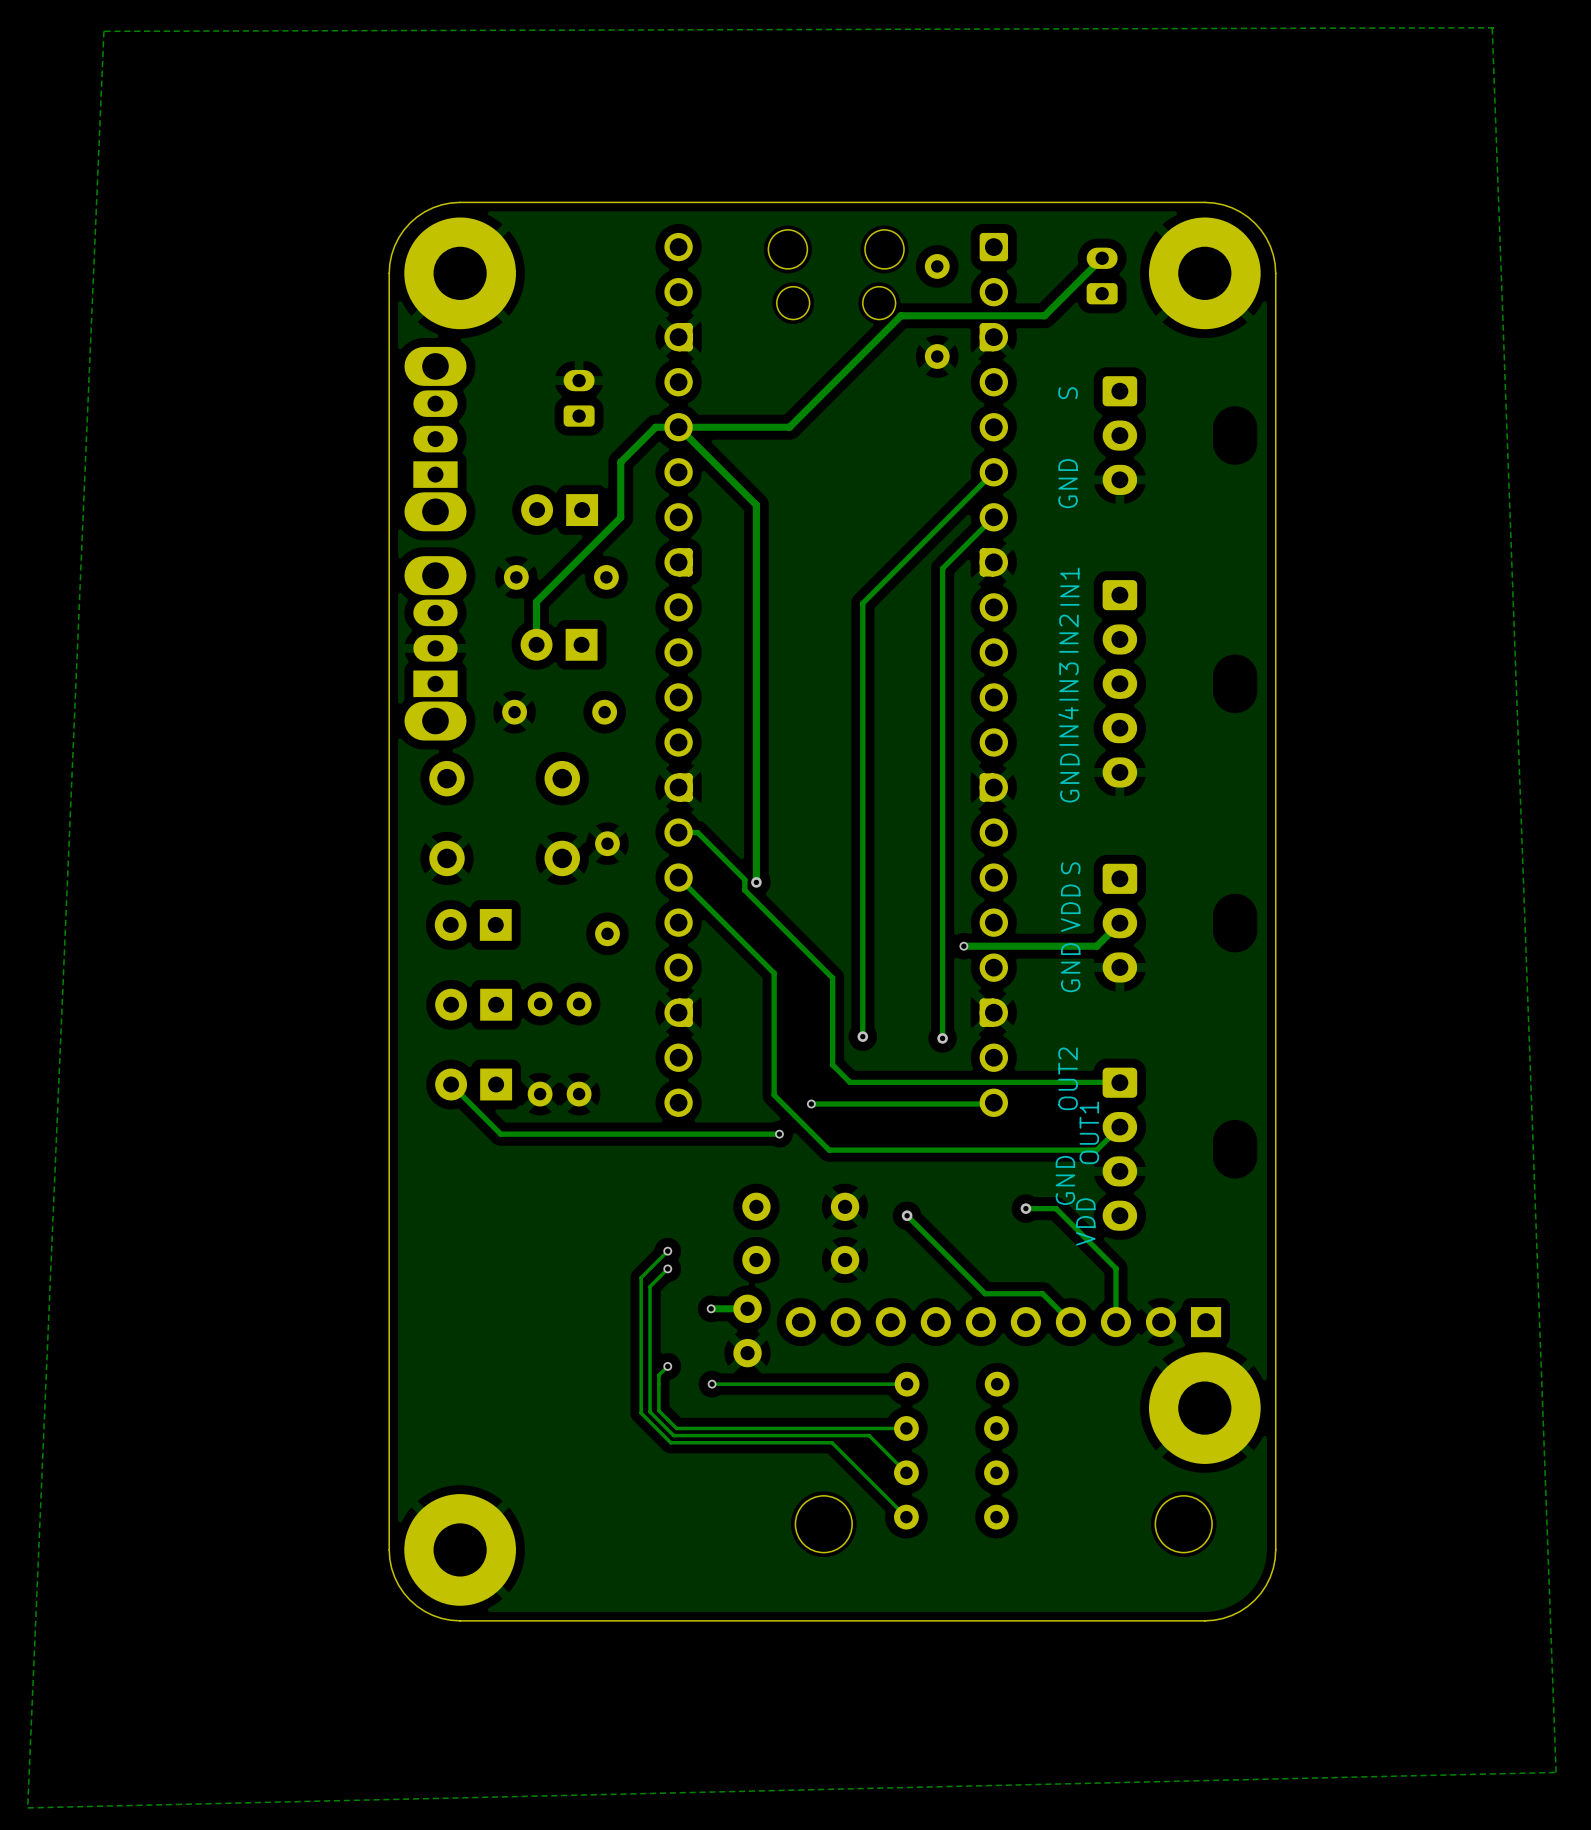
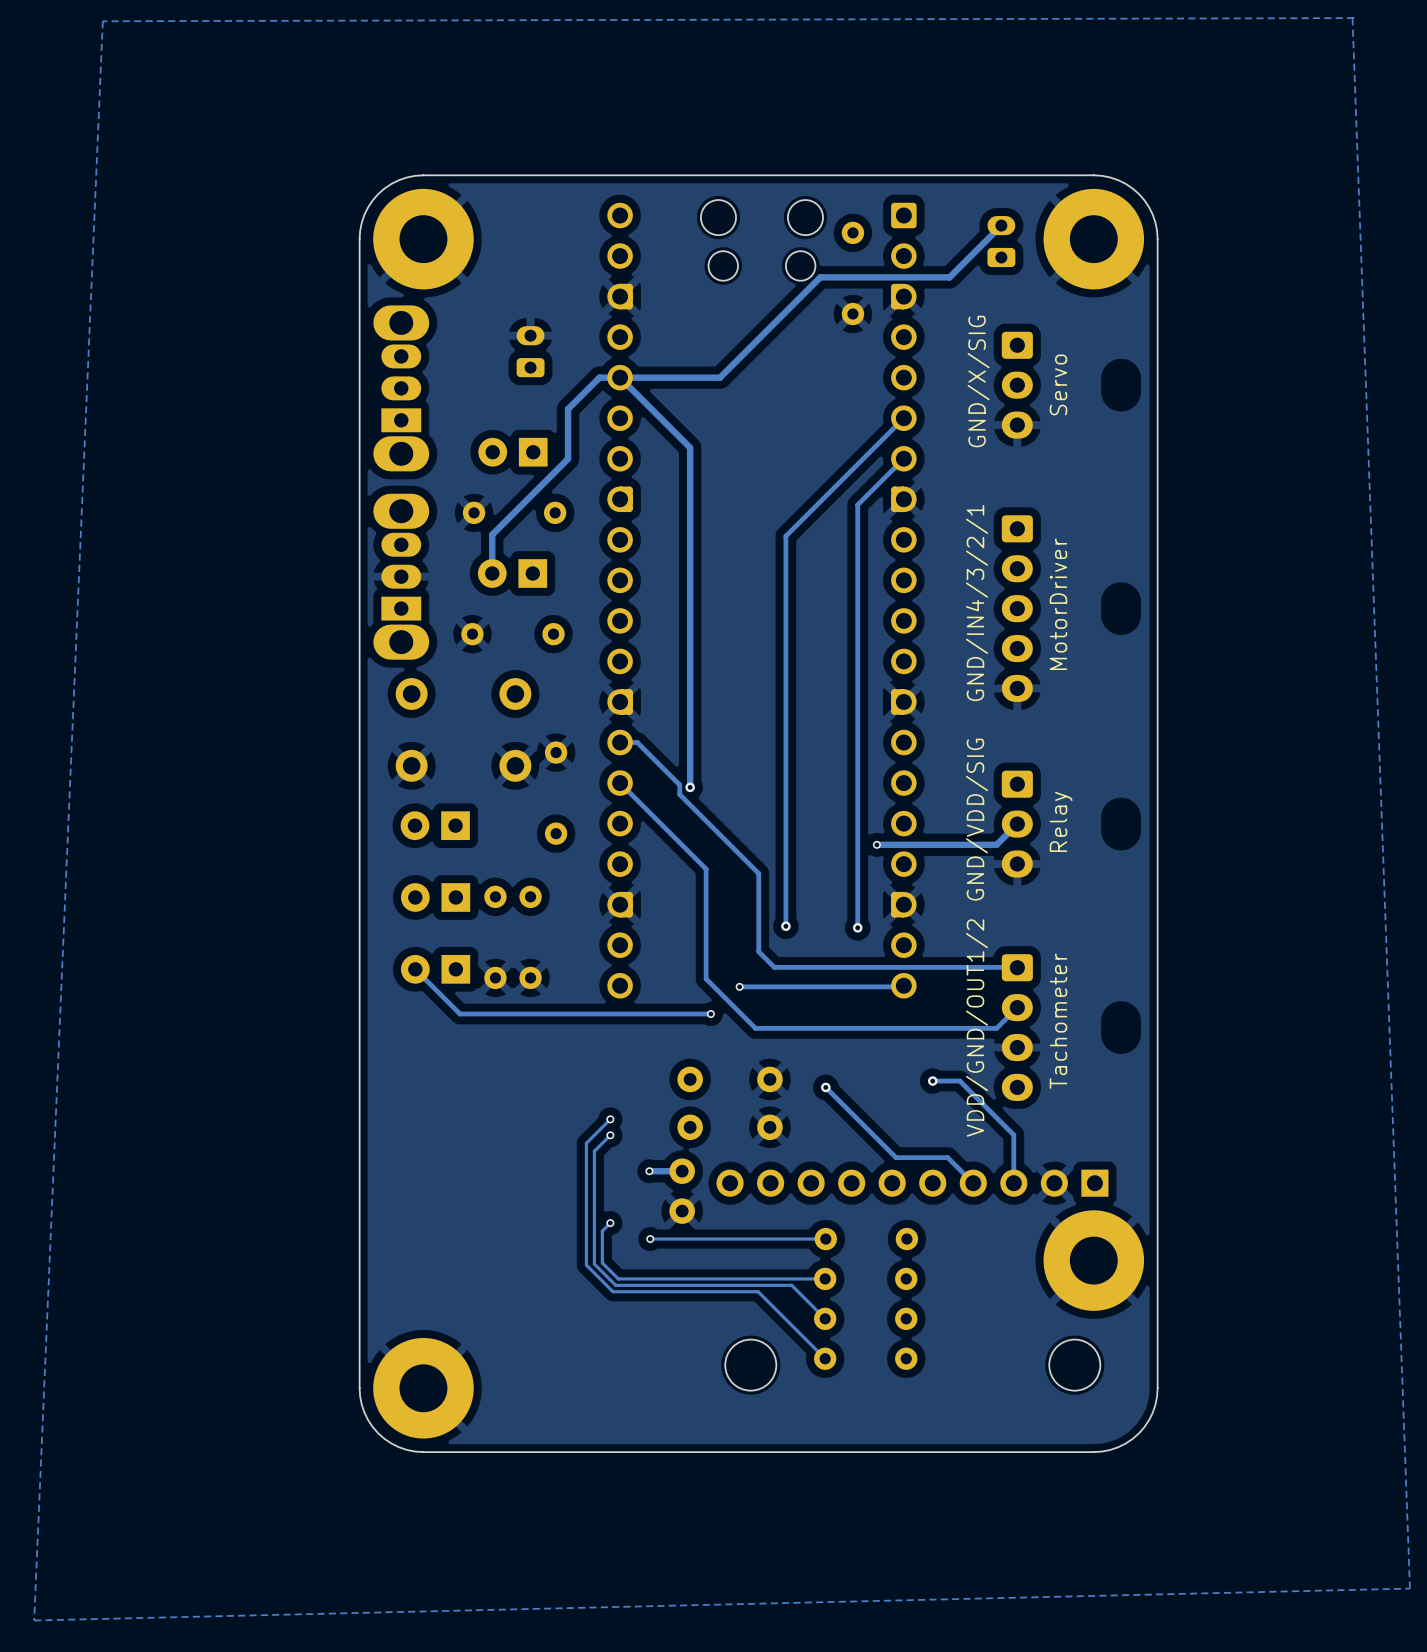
text: S (1068, 393) -> none
text: none -> Servo (1058, 384)
text: GND (1068, 483) -> GND/X/SIG (978, 381)
text: IN1 (1069, 586) -> none
text: IN2 (1068, 633) -> none
text: none -> MotorDriver (1058, 604)
text: IN3 (1068, 681) -> none
text: IN4 (1068, 726) -> none
text: GND (1069, 777) -> GND/IN4/3/2/1 (977, 603)
text: S (1070, 868) -> none
text: VDD (1070, 908) -> none
text: none -> Relay (1061, 821)
text: GND (1070, 967) -> GND/VDD/SIG (977, 819)
text: OUT2 (1068, 1078) -> none
text: OUT1 (1089, 1132) -> none
text: none -> Tachometer (1058, 1021)
text: none -> VDD/GND/OUT1/2 (977, 1028)
text: GND (1065, 1180) -> none
text: VDD (1085, 1221) -> none

